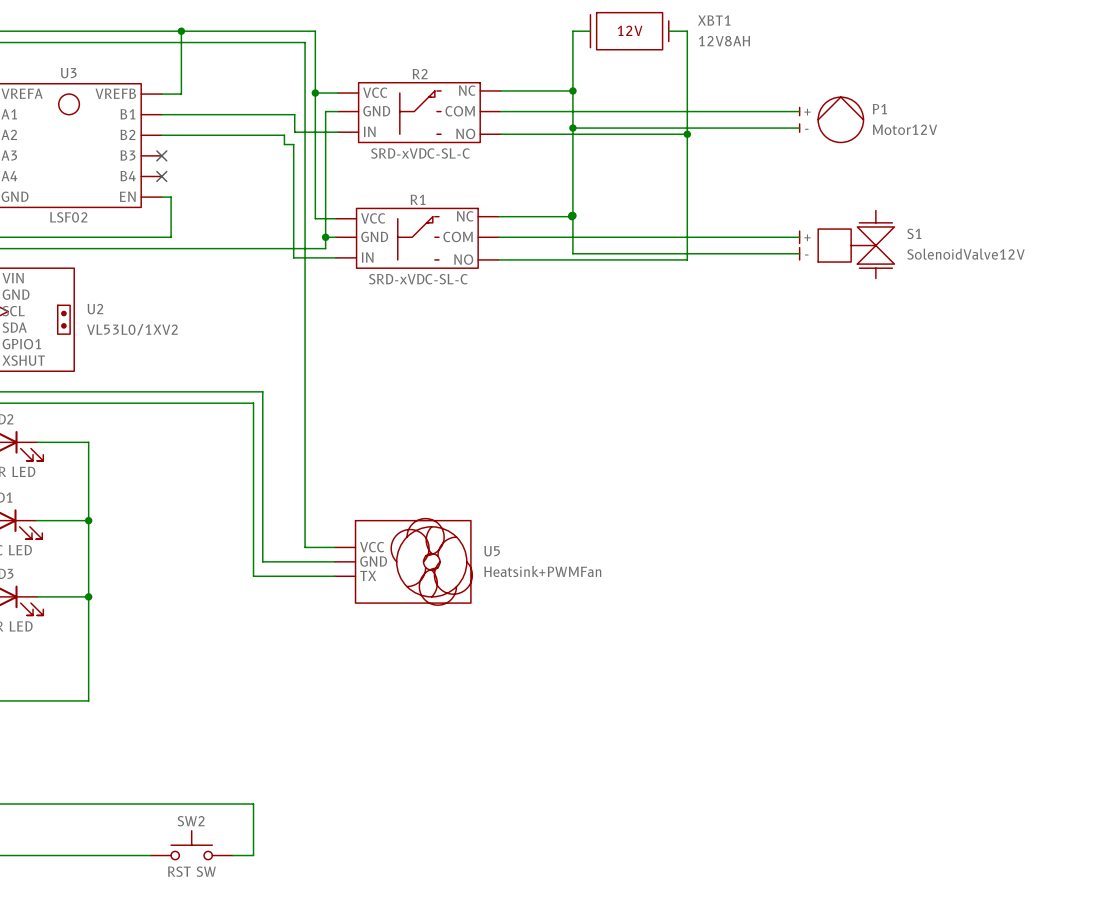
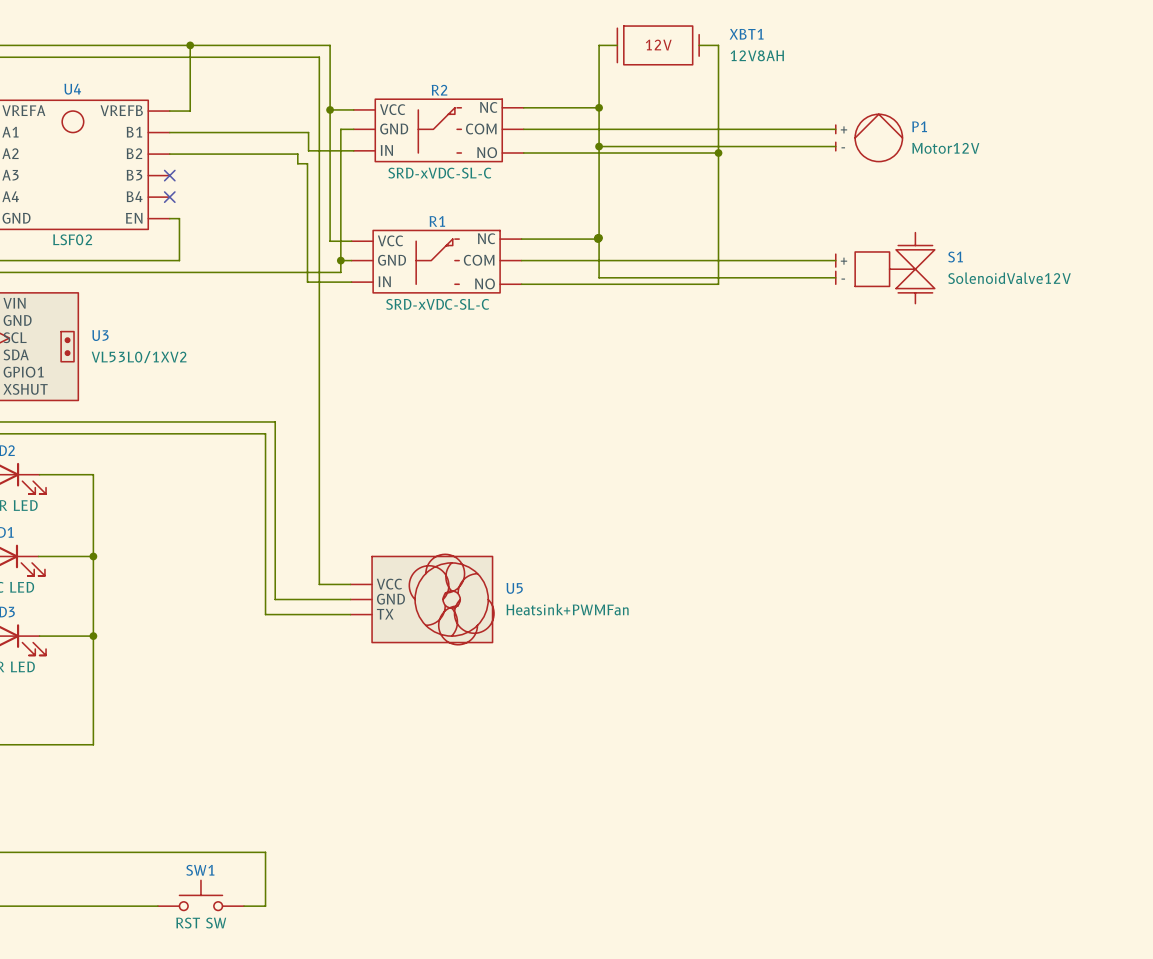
U3 name: U3 (68, 73) -> U4 (72, 89)
U2 name: U2 (95, 309) -> U3 (100, 335)
SW2 name: SW2 (191, 821) -> SW1 (200, 870)

